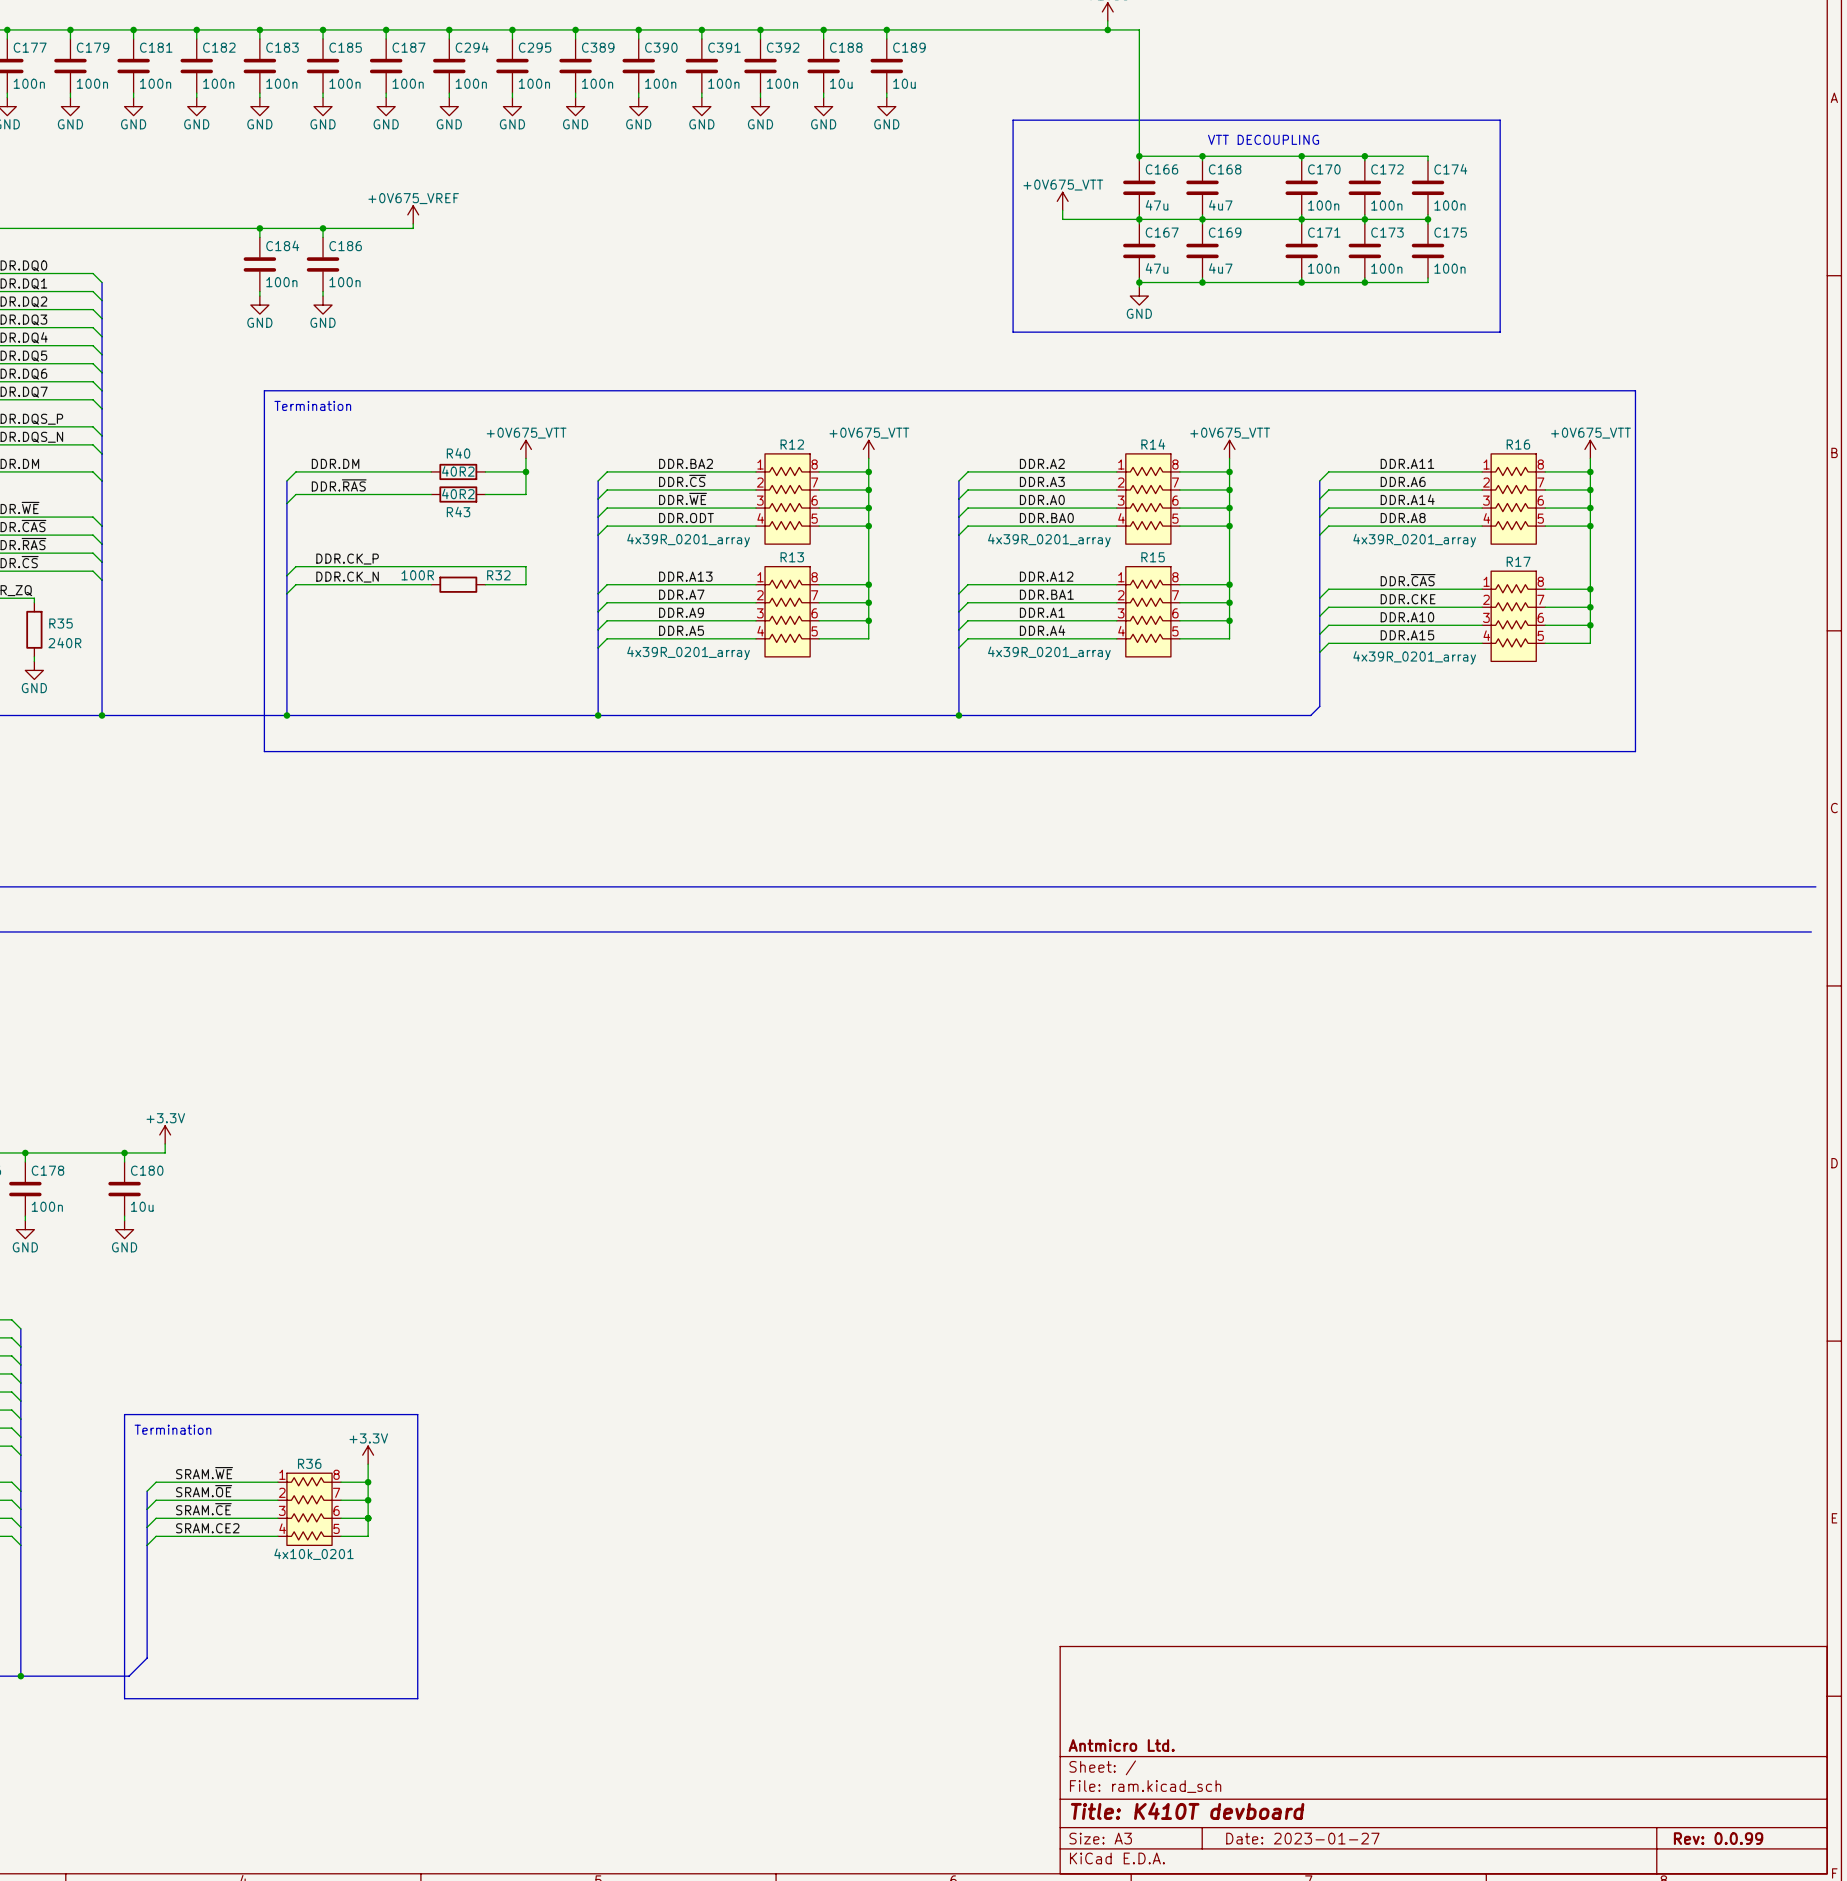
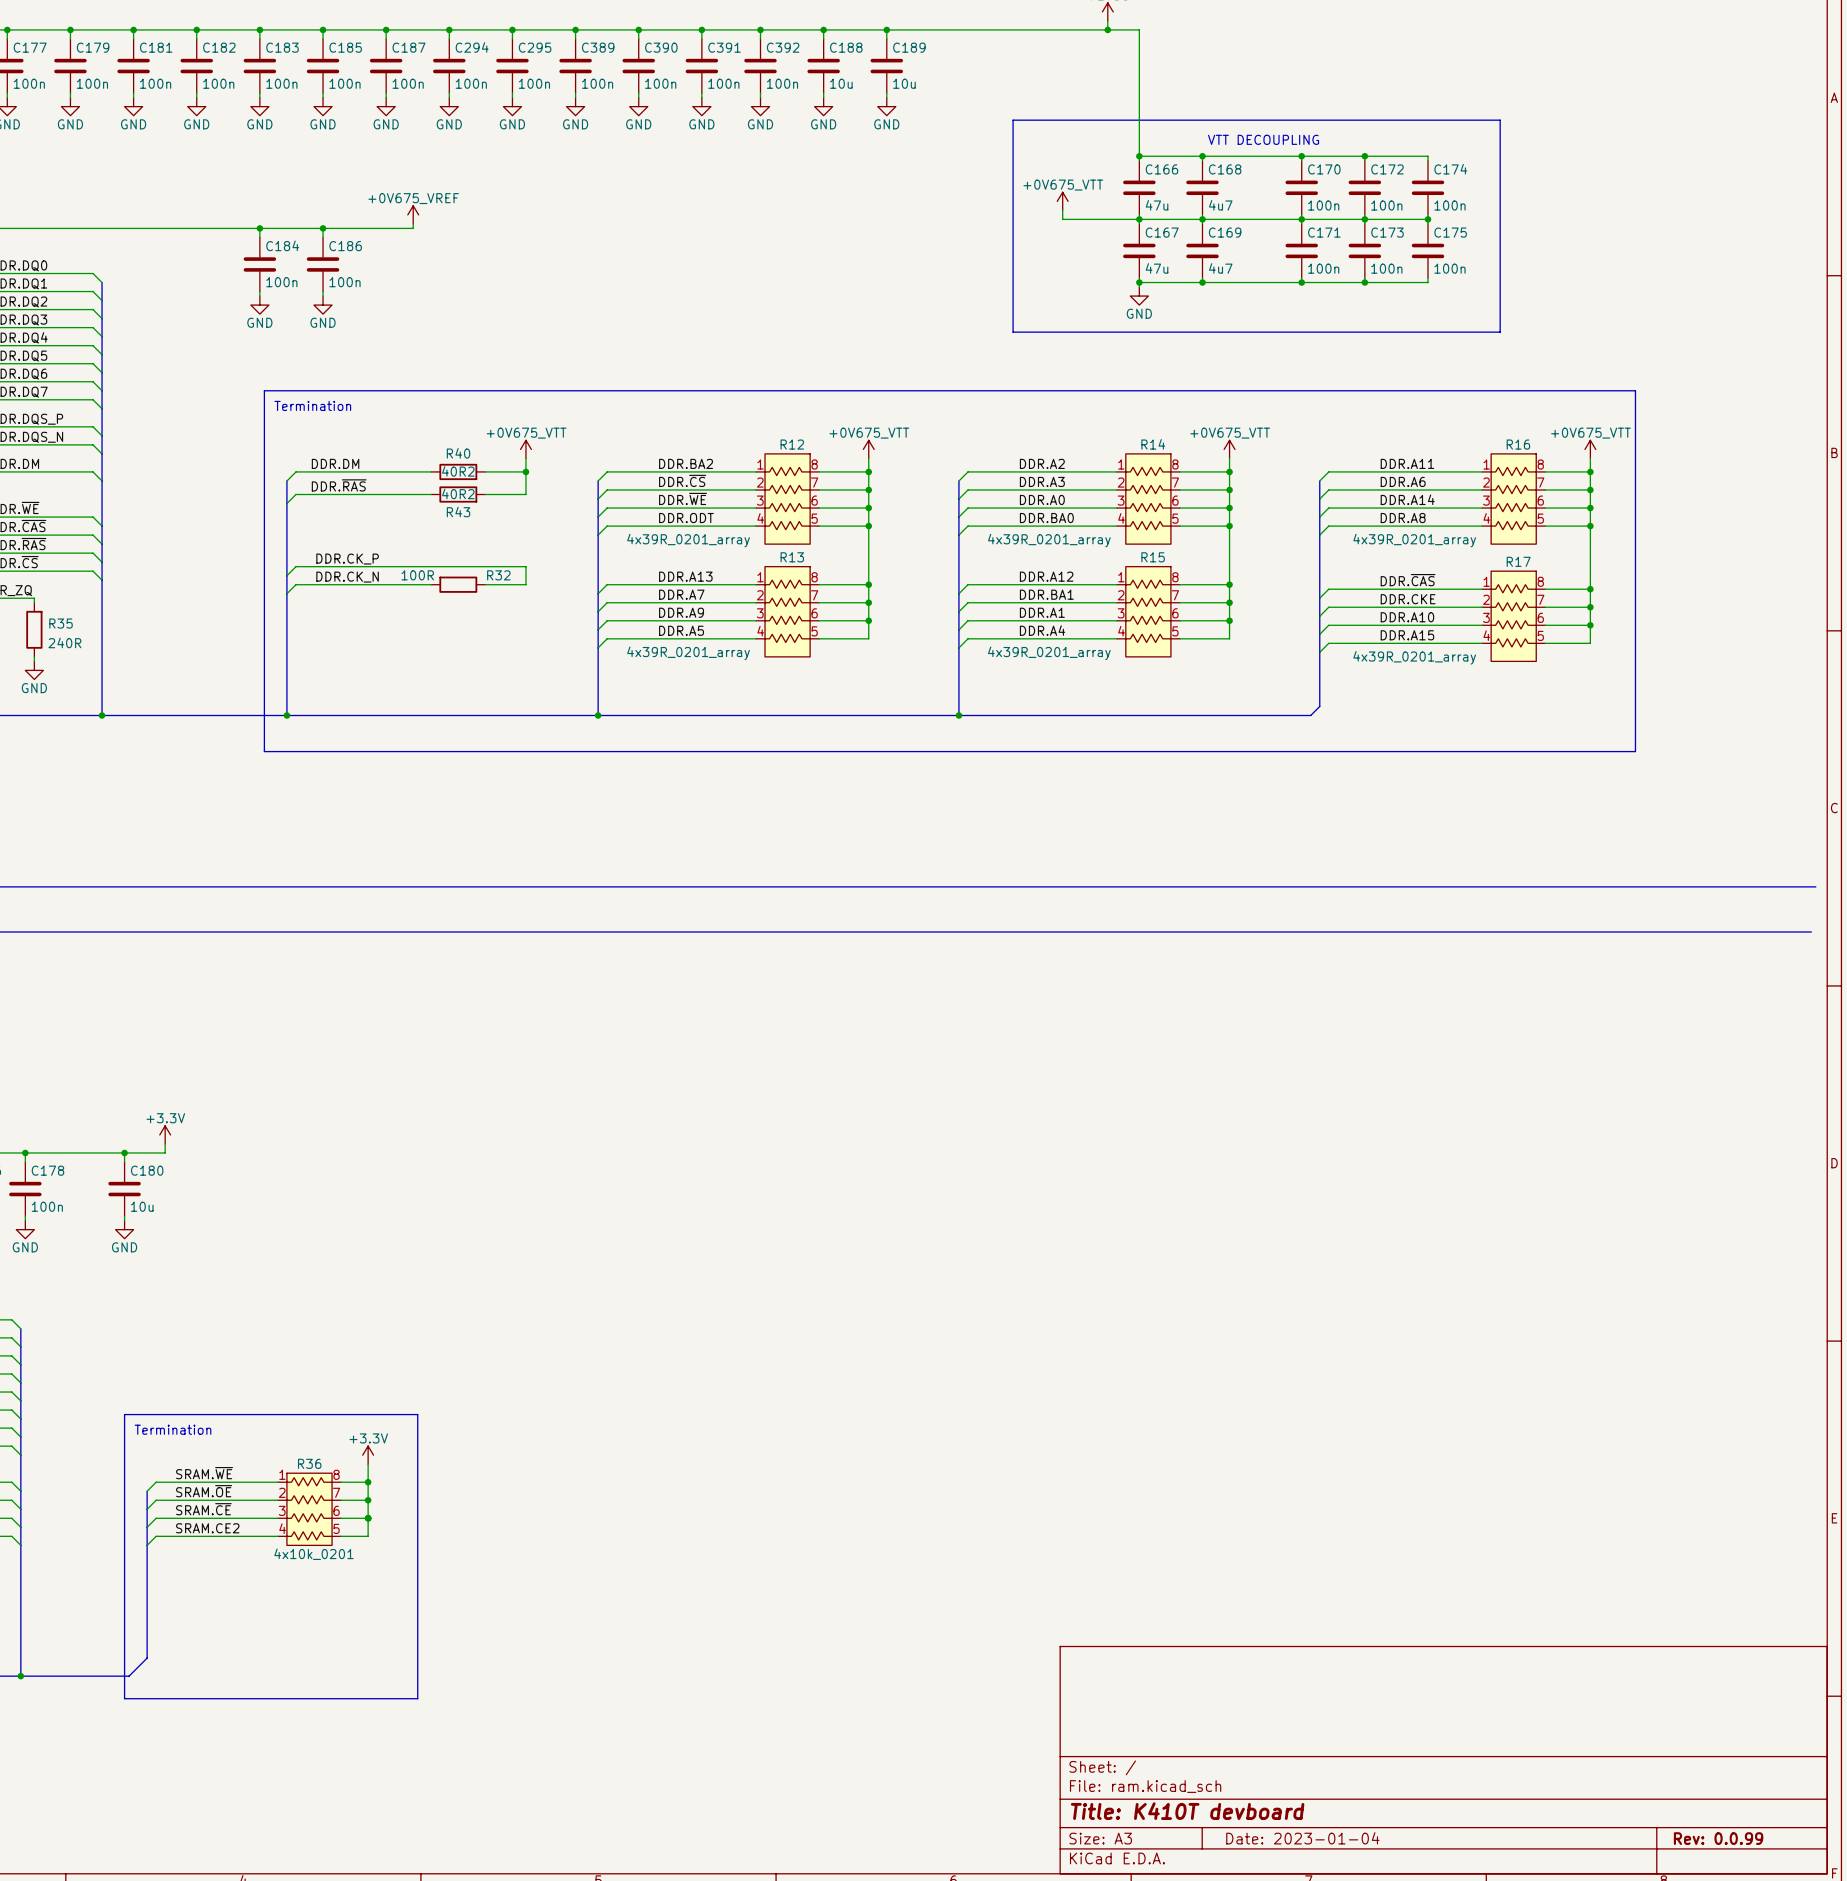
title block: Antmicro Ltd. (1121, 1745) -> none
title block: Date: 2023-01-27 (1302, 1838) -> Date: 2023-01-04 (1302, 1838)

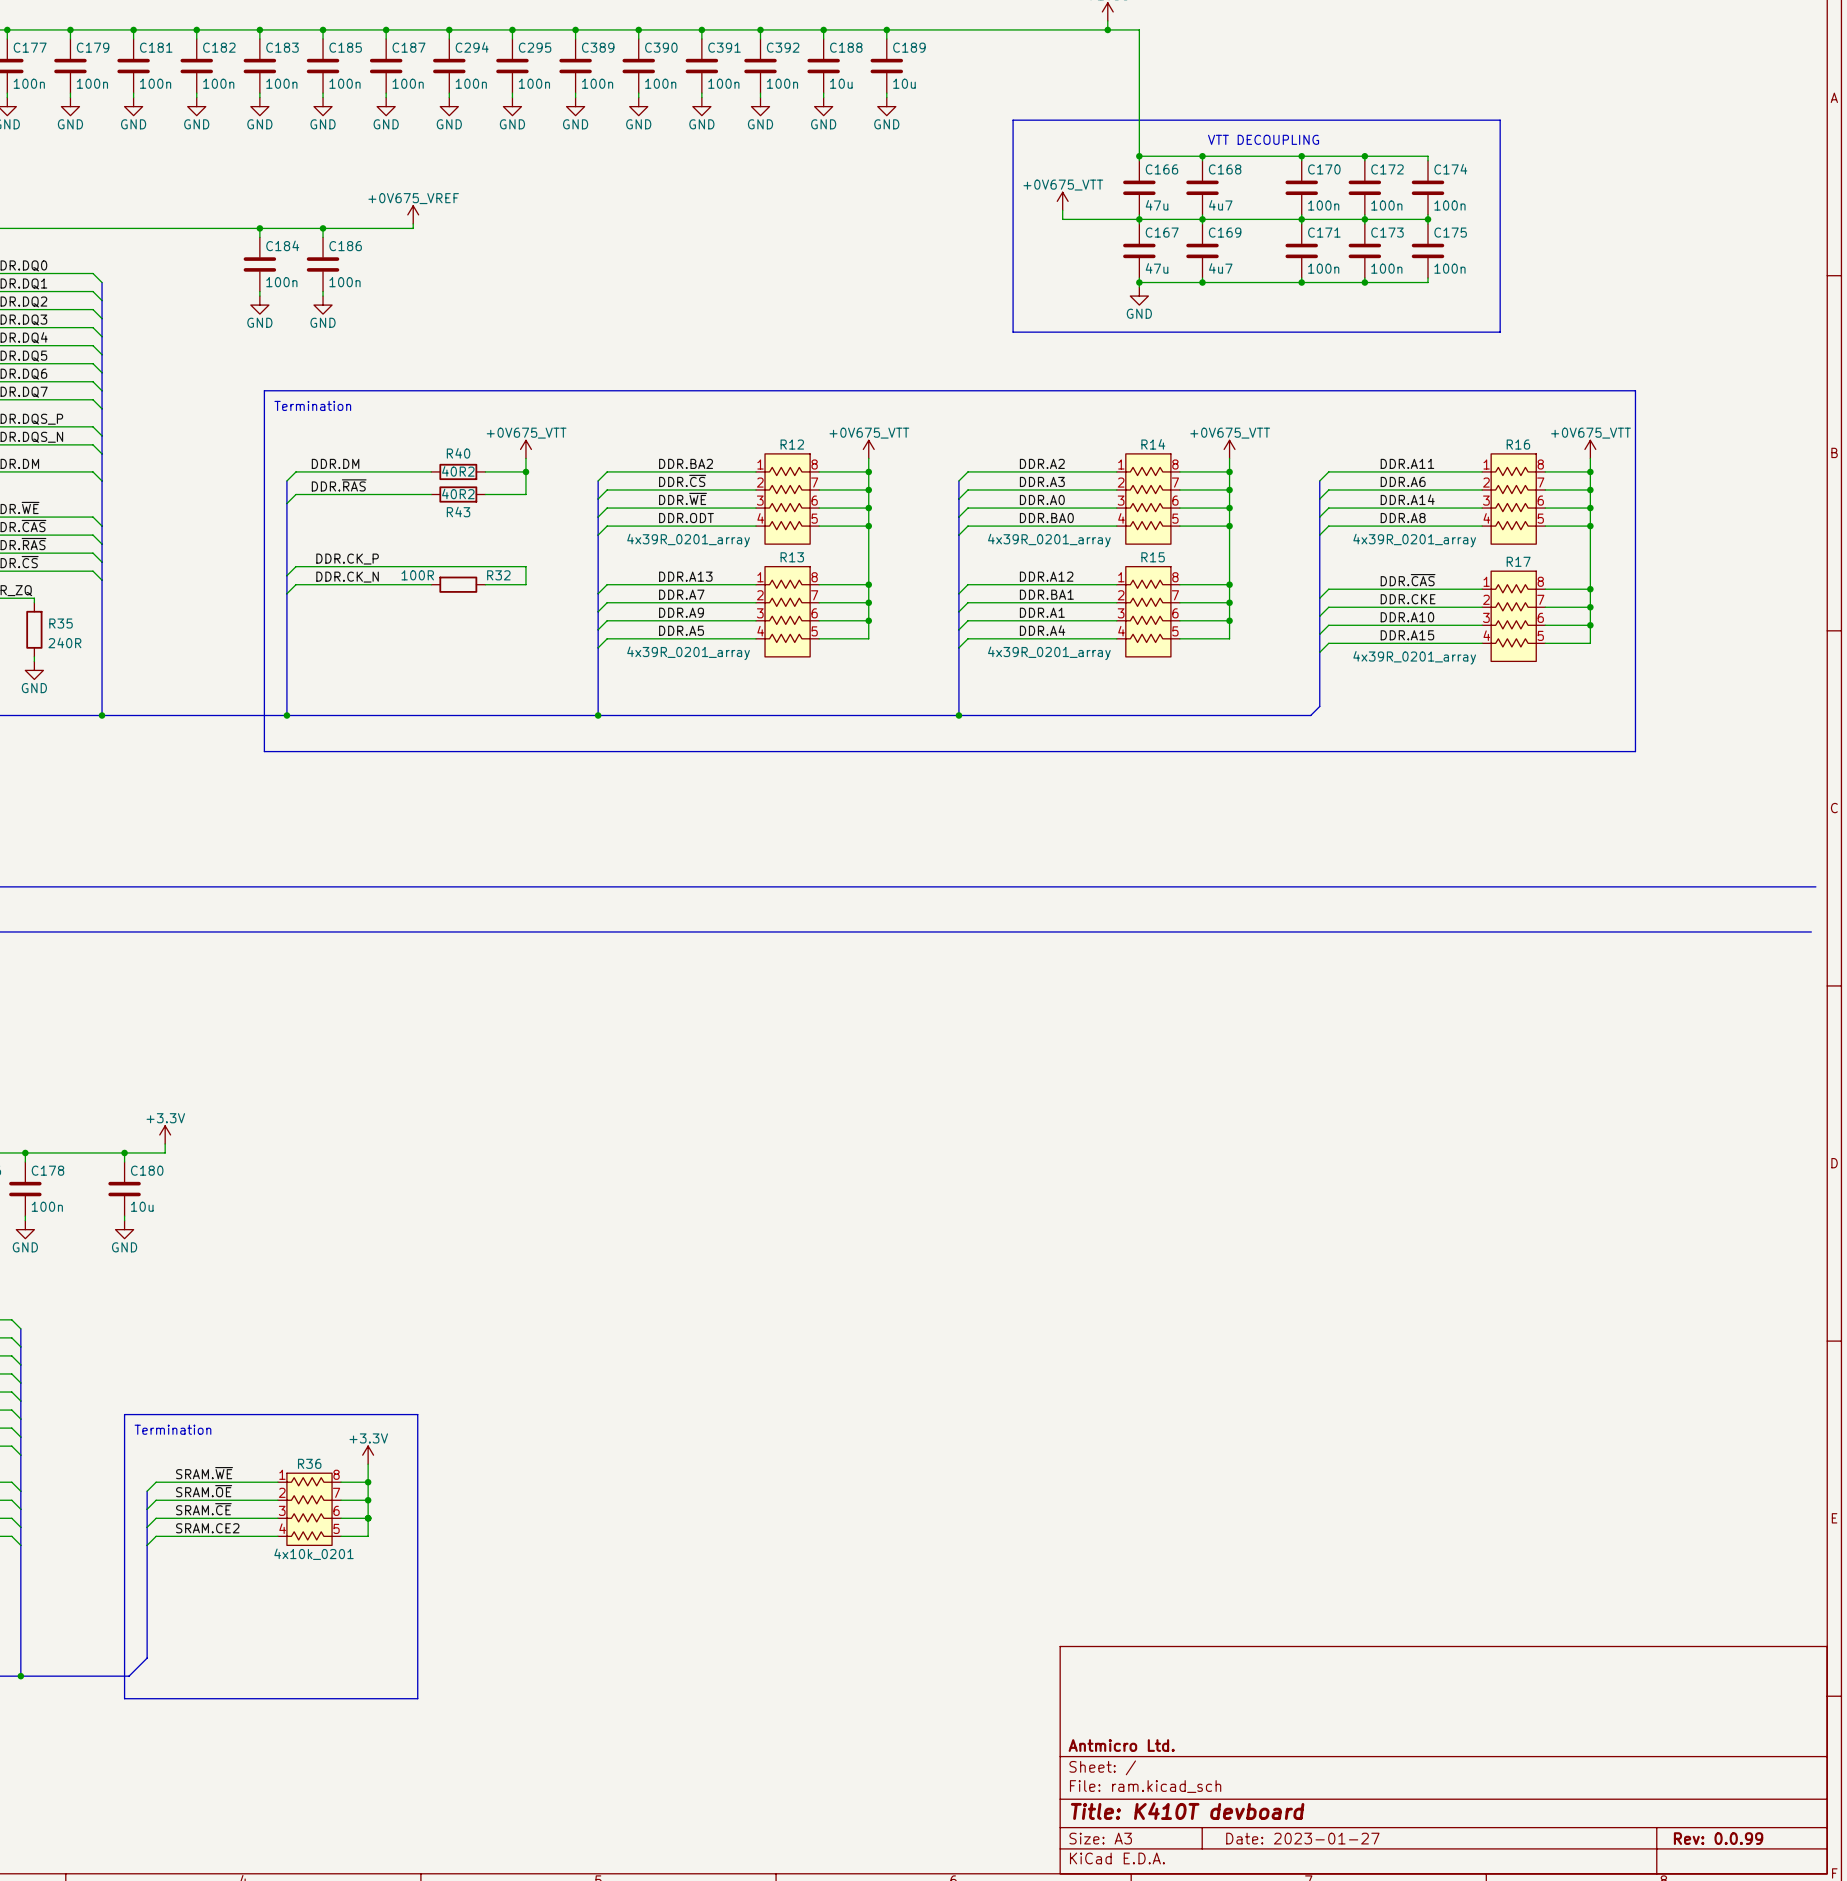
title block: none -> Antmicro Ltd. (1121, 1745)
title block: Date: 2023-01-04 (1302, 1838) -> Date: 2023-01-27 (1302, 1838)

